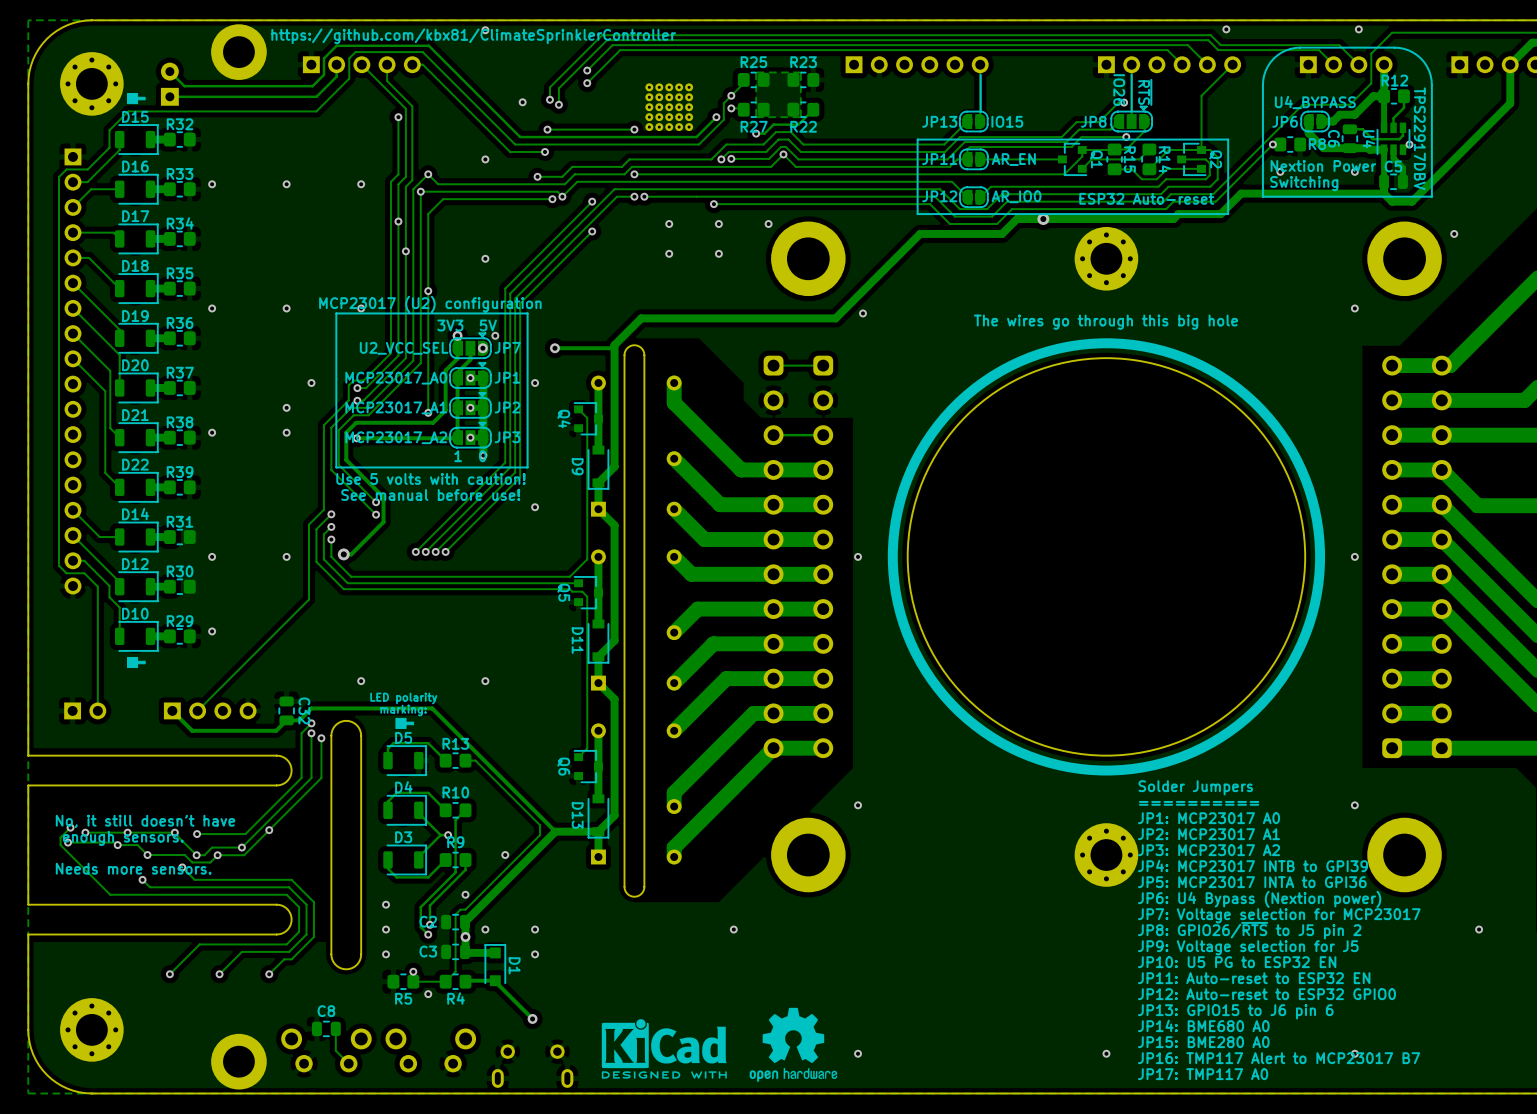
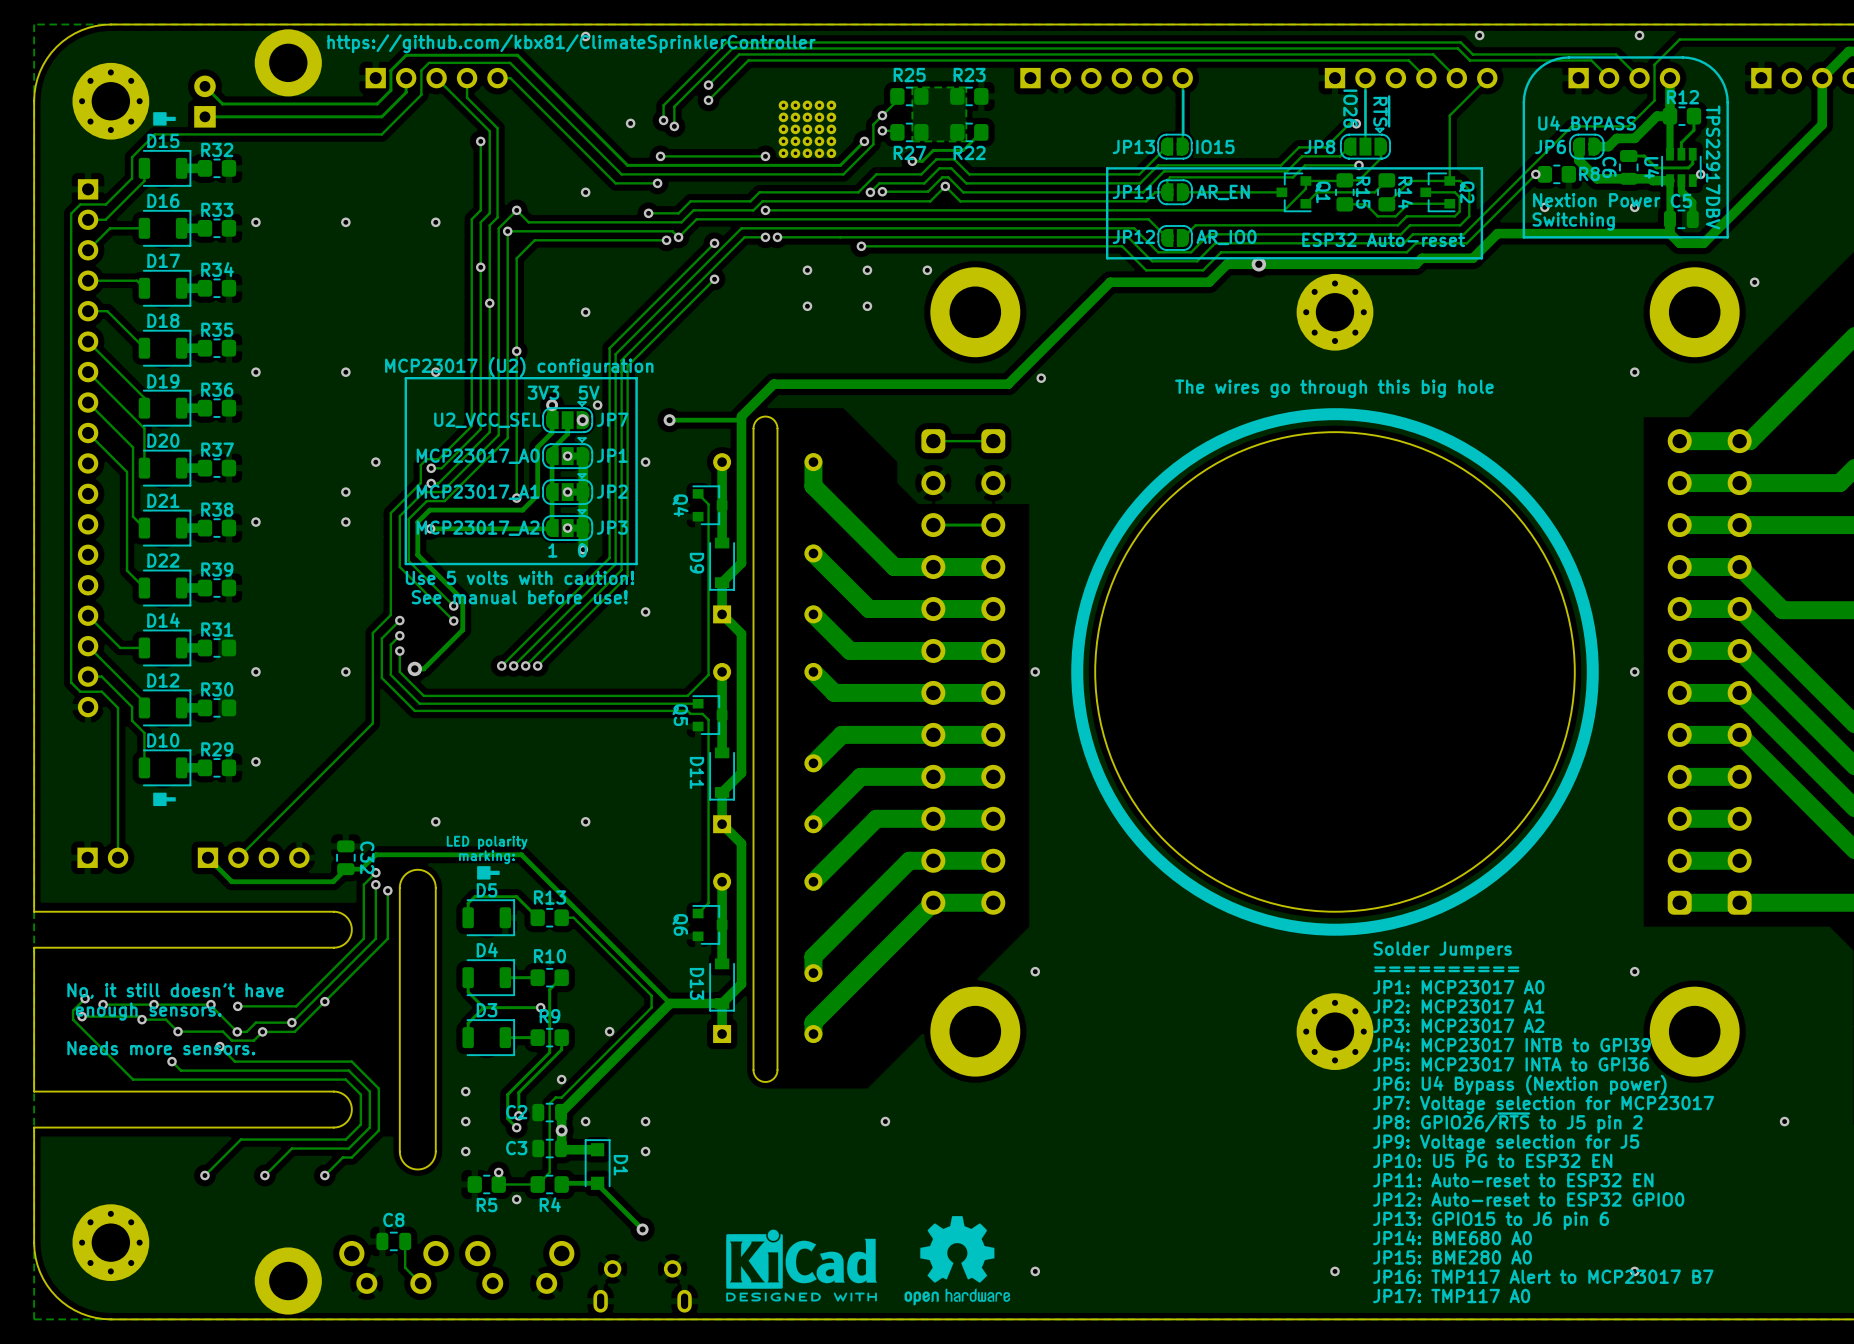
track: none -> (468, 977) (468, 992) (483, 1007)
track: (418, 810) (418, 813) (440, 835) (418, 857) (418, 859) -> none
track: (445, 810) (428, 792) (396, 792) (388, 801) (388, 810) -> (537, 977) (505, 977)
track: none -> (483, 1007) (468, 1023) (468, 1037)
track: none -> (531, 1007) (483, 1007)
track: (445, 859) (428, 877) (396, 877) (388, 868) (388, 859) -> (537, 1037) (505, 1037)

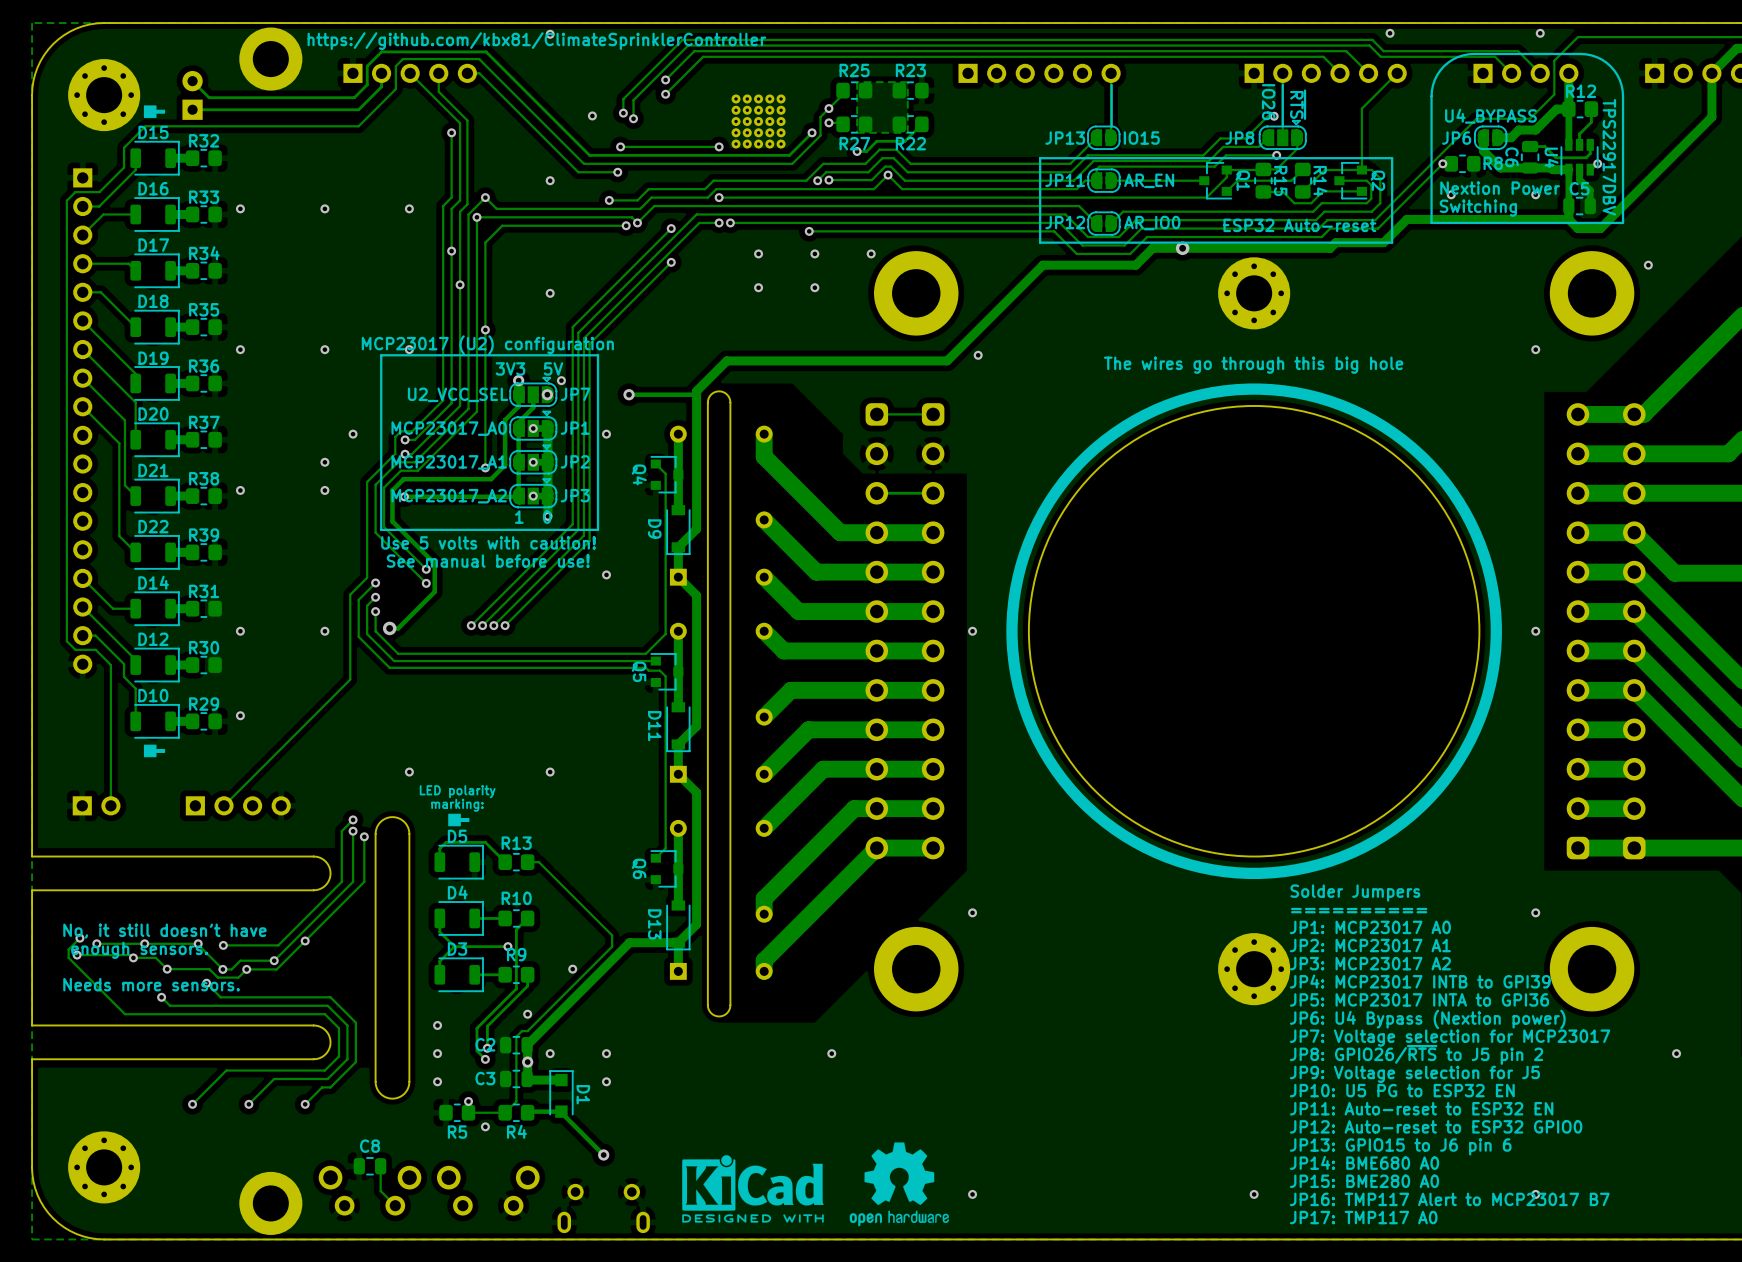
track: (208, 857) (231, 881) (333, 881) (345, 869) (361, 869) (375, 854) (521, 854) (670, 1003) -> none
C32: (345, 857) -> none

